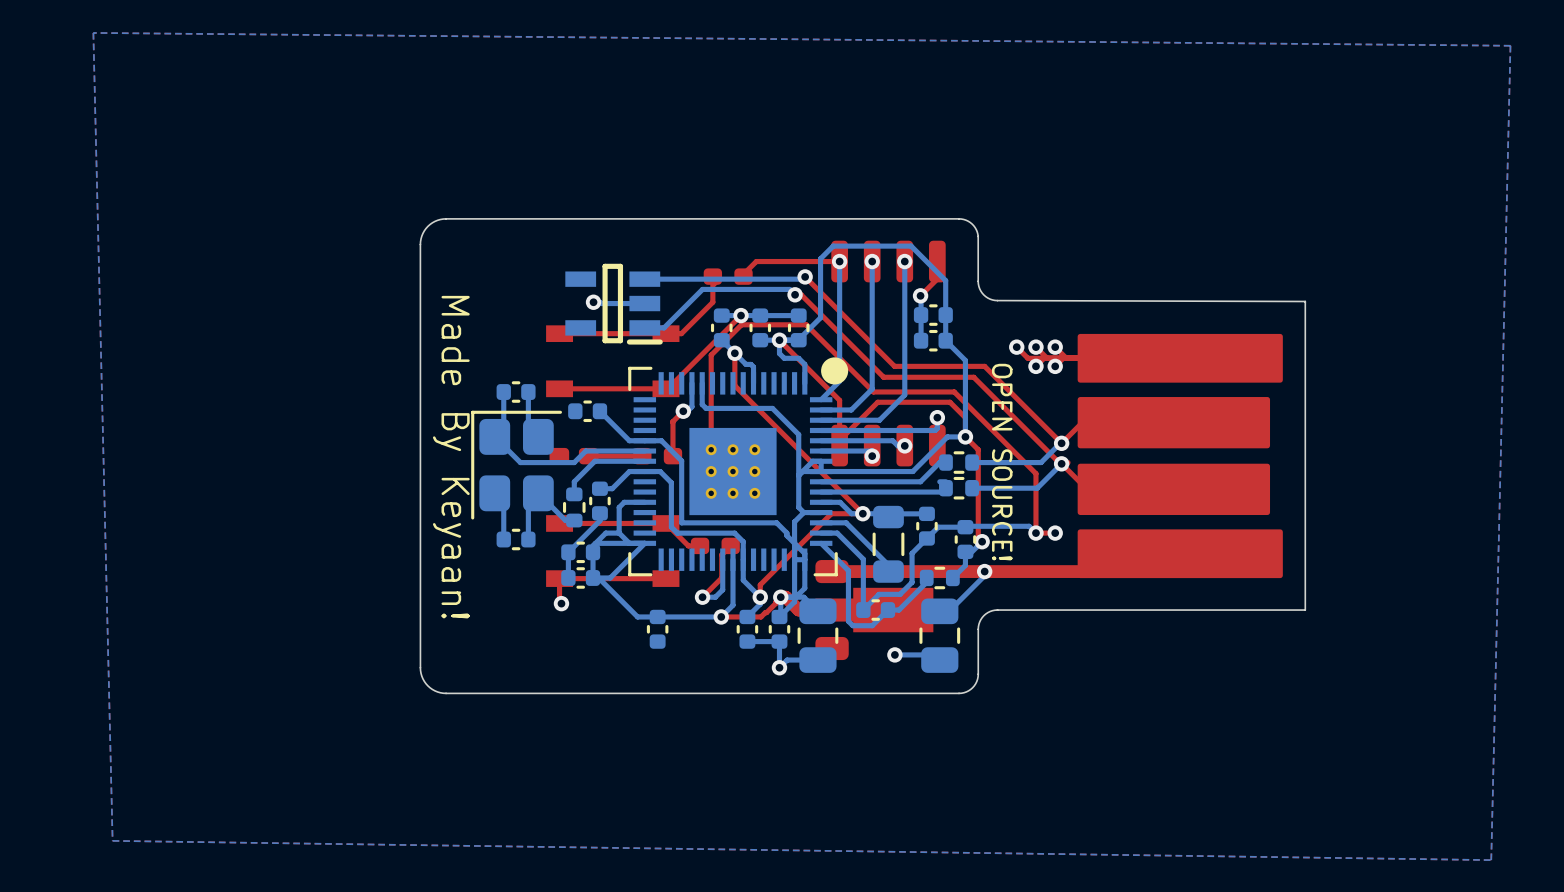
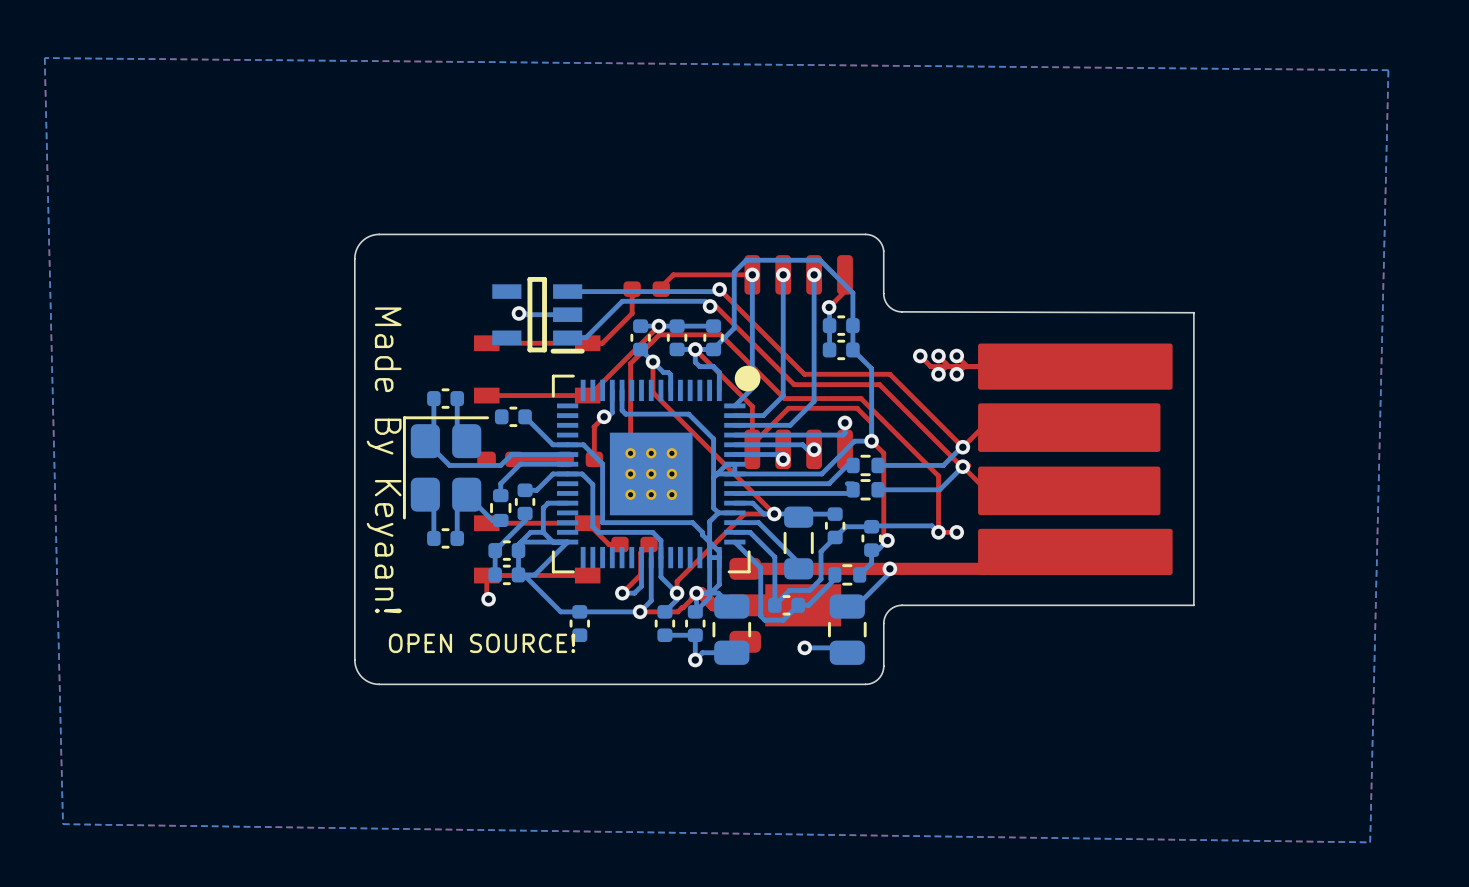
text rotation: 0° (1002, 462) -> 90° counterclockwise (482, 643)
text position: OPEN SOURCE! (1002, 462) -> OPEN SOURCE! (482, 643)

